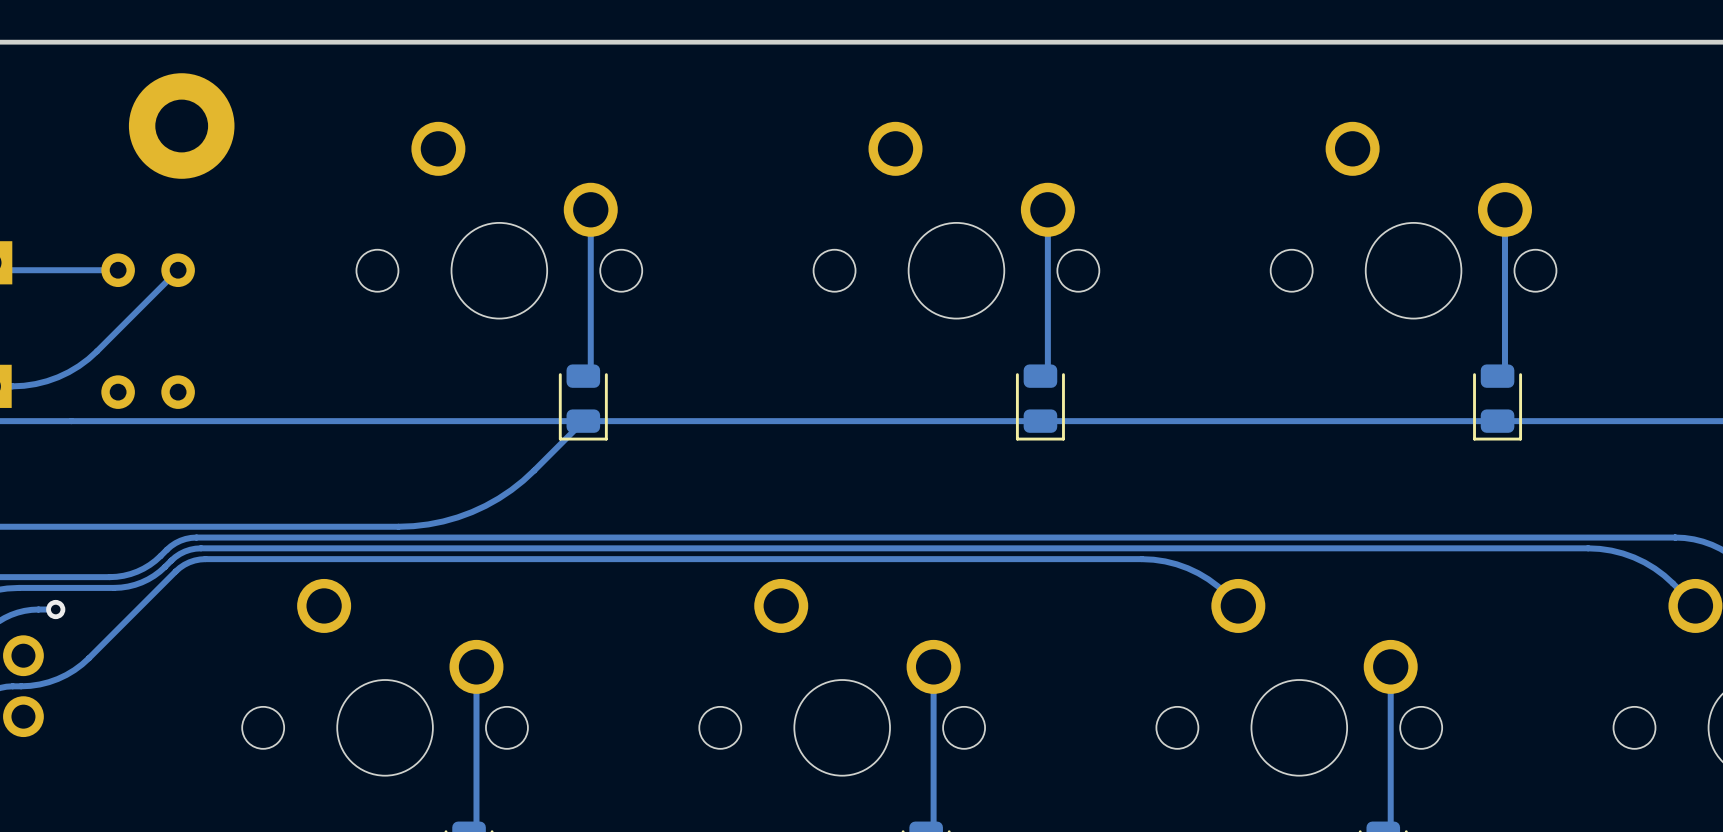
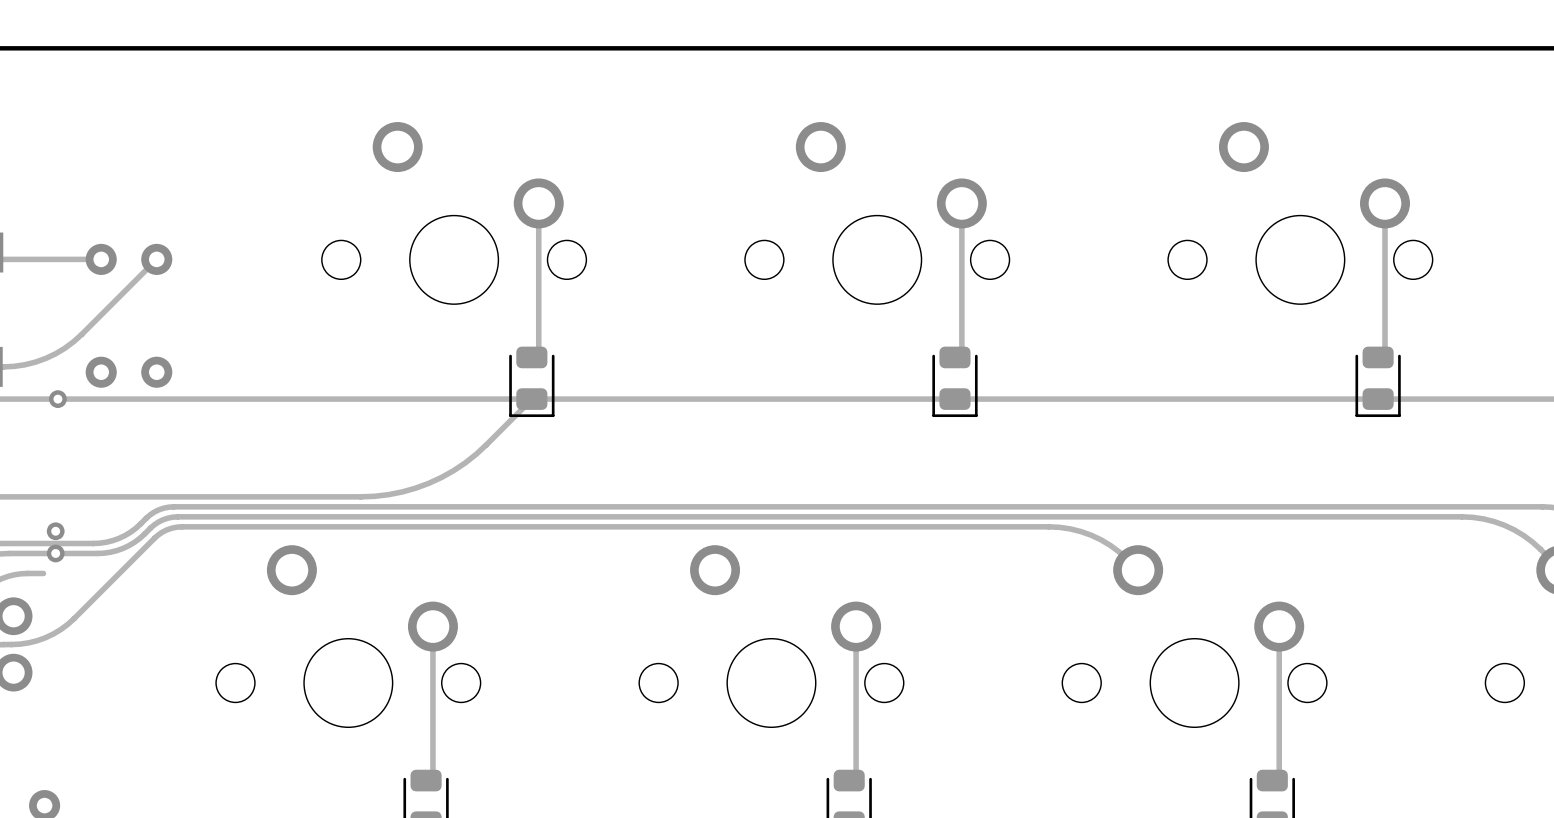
part: (181, 126) -> none
via: none -> (57, 399)
via: none -> (55, 531)
via: none -> (55, 553)
via: (55, 609) -> none

